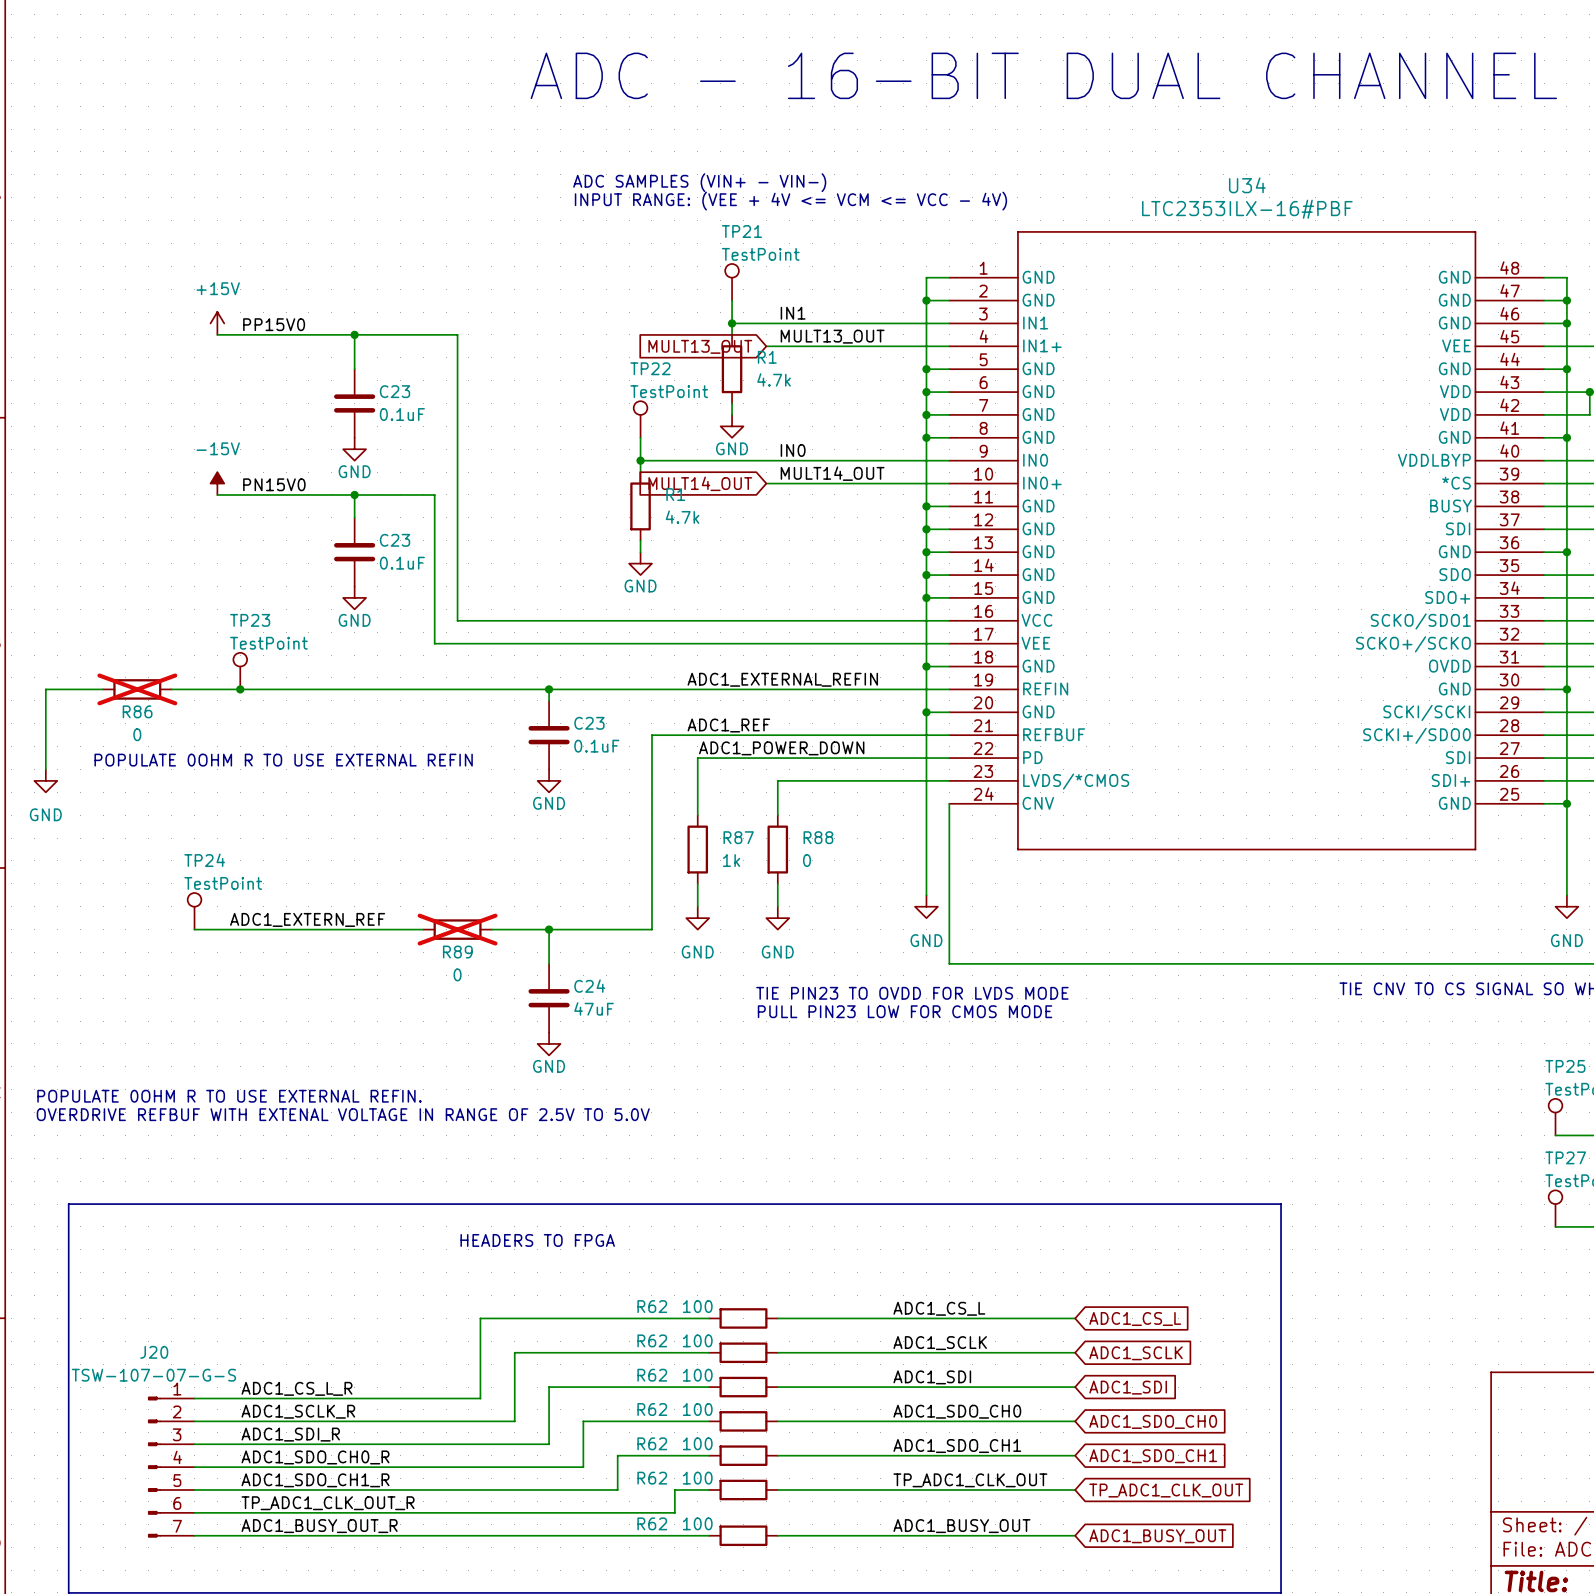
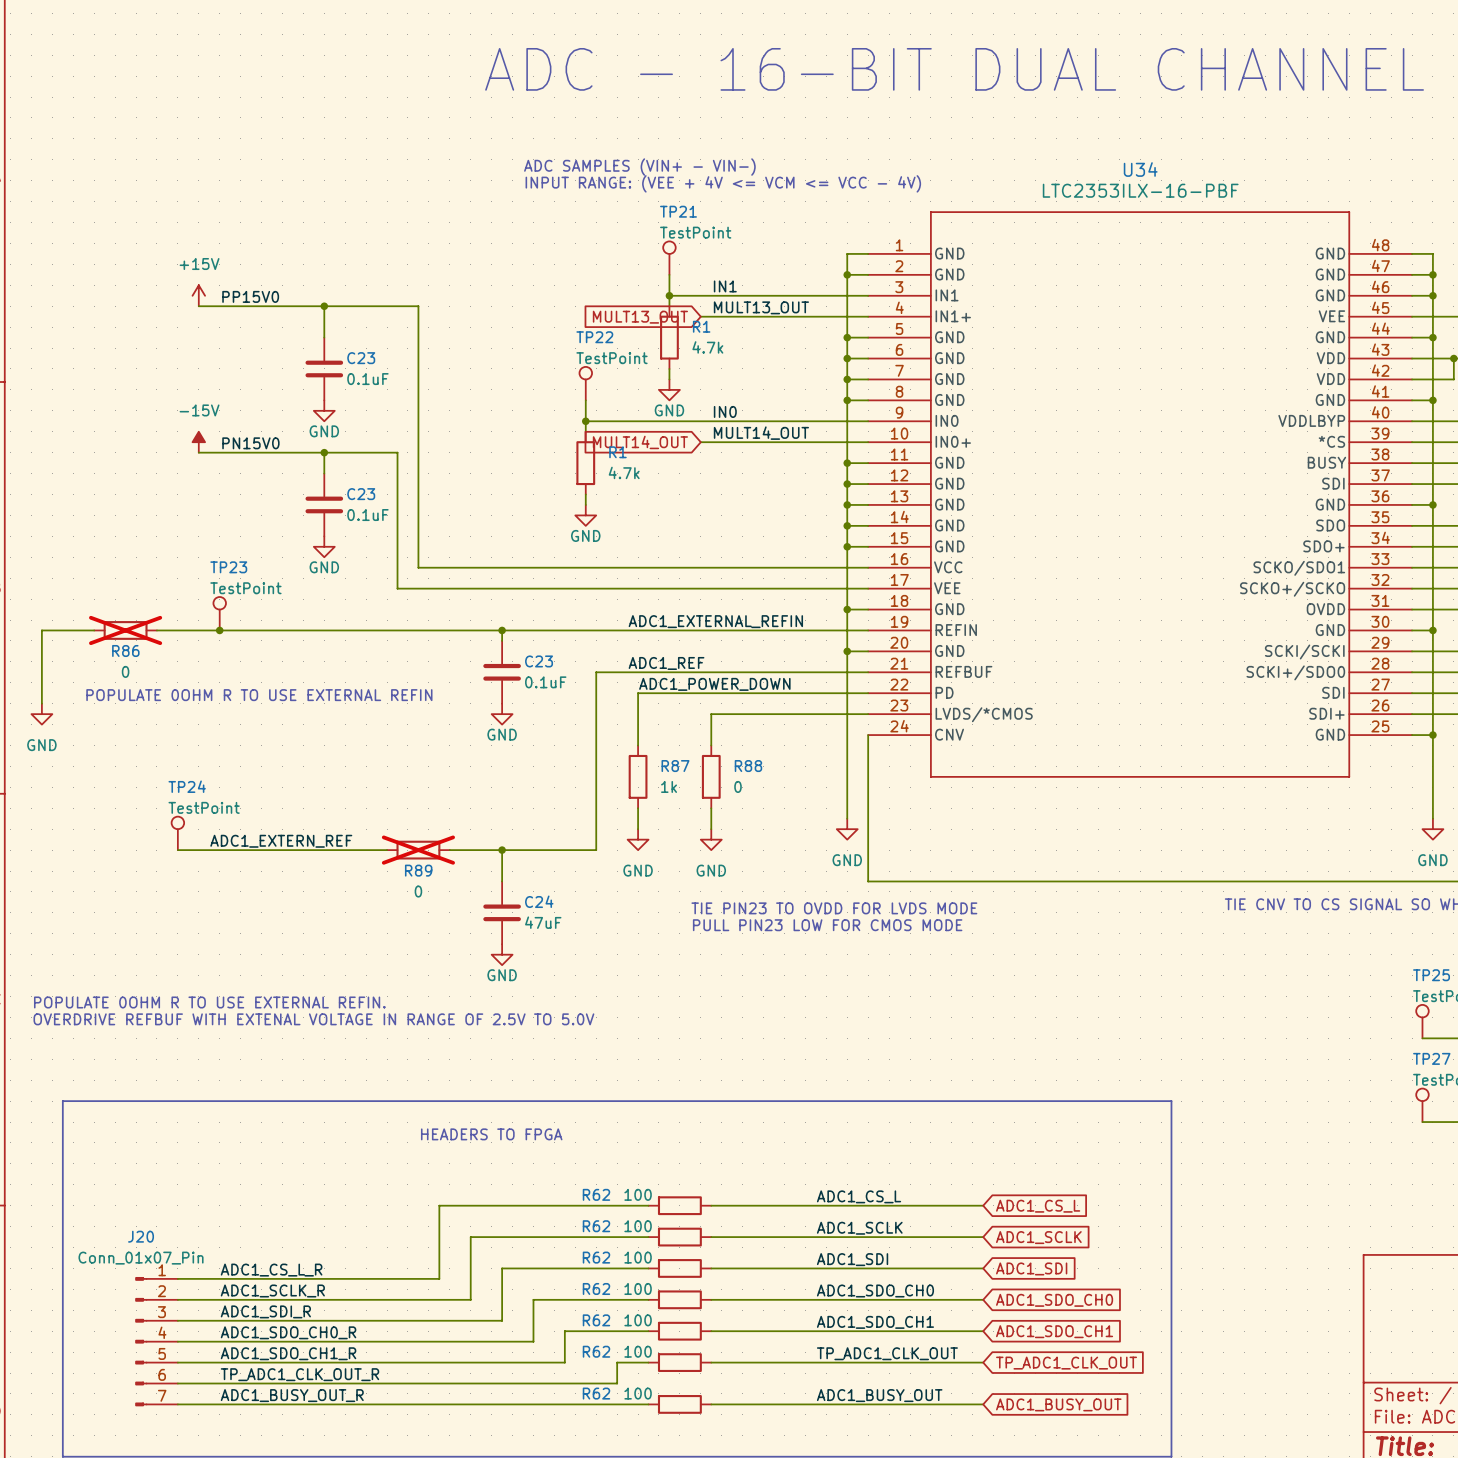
U34 value: LTC2353ILX-16#PBF (1247, 209) -> LTC2353ILX-16-PBF (1140, 190)
J20 value: TSW-107-07-G-S (153, 1375) -> Conn_01x07_Pin (141, 1258)

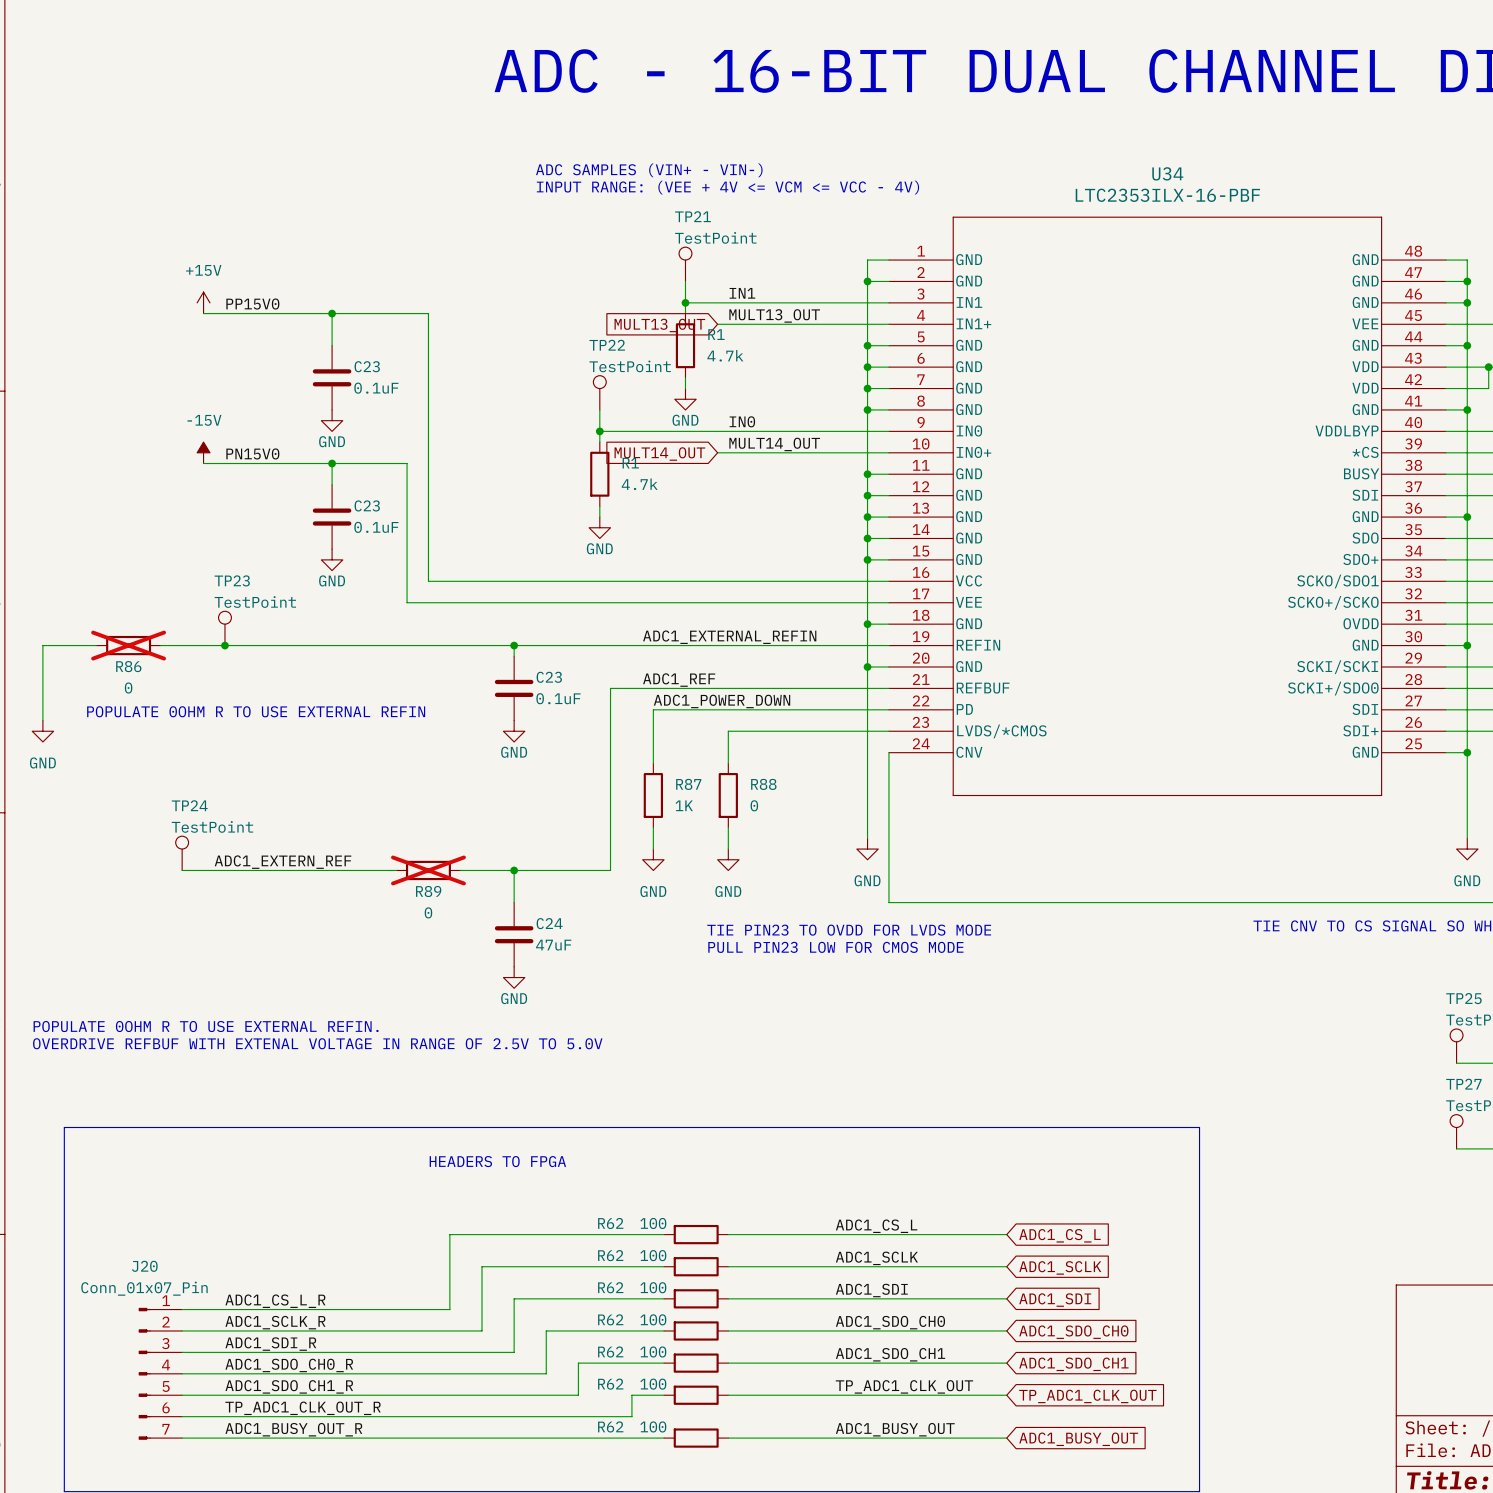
R87 value: 1k (669, 786) -> 1K (684, 805)

